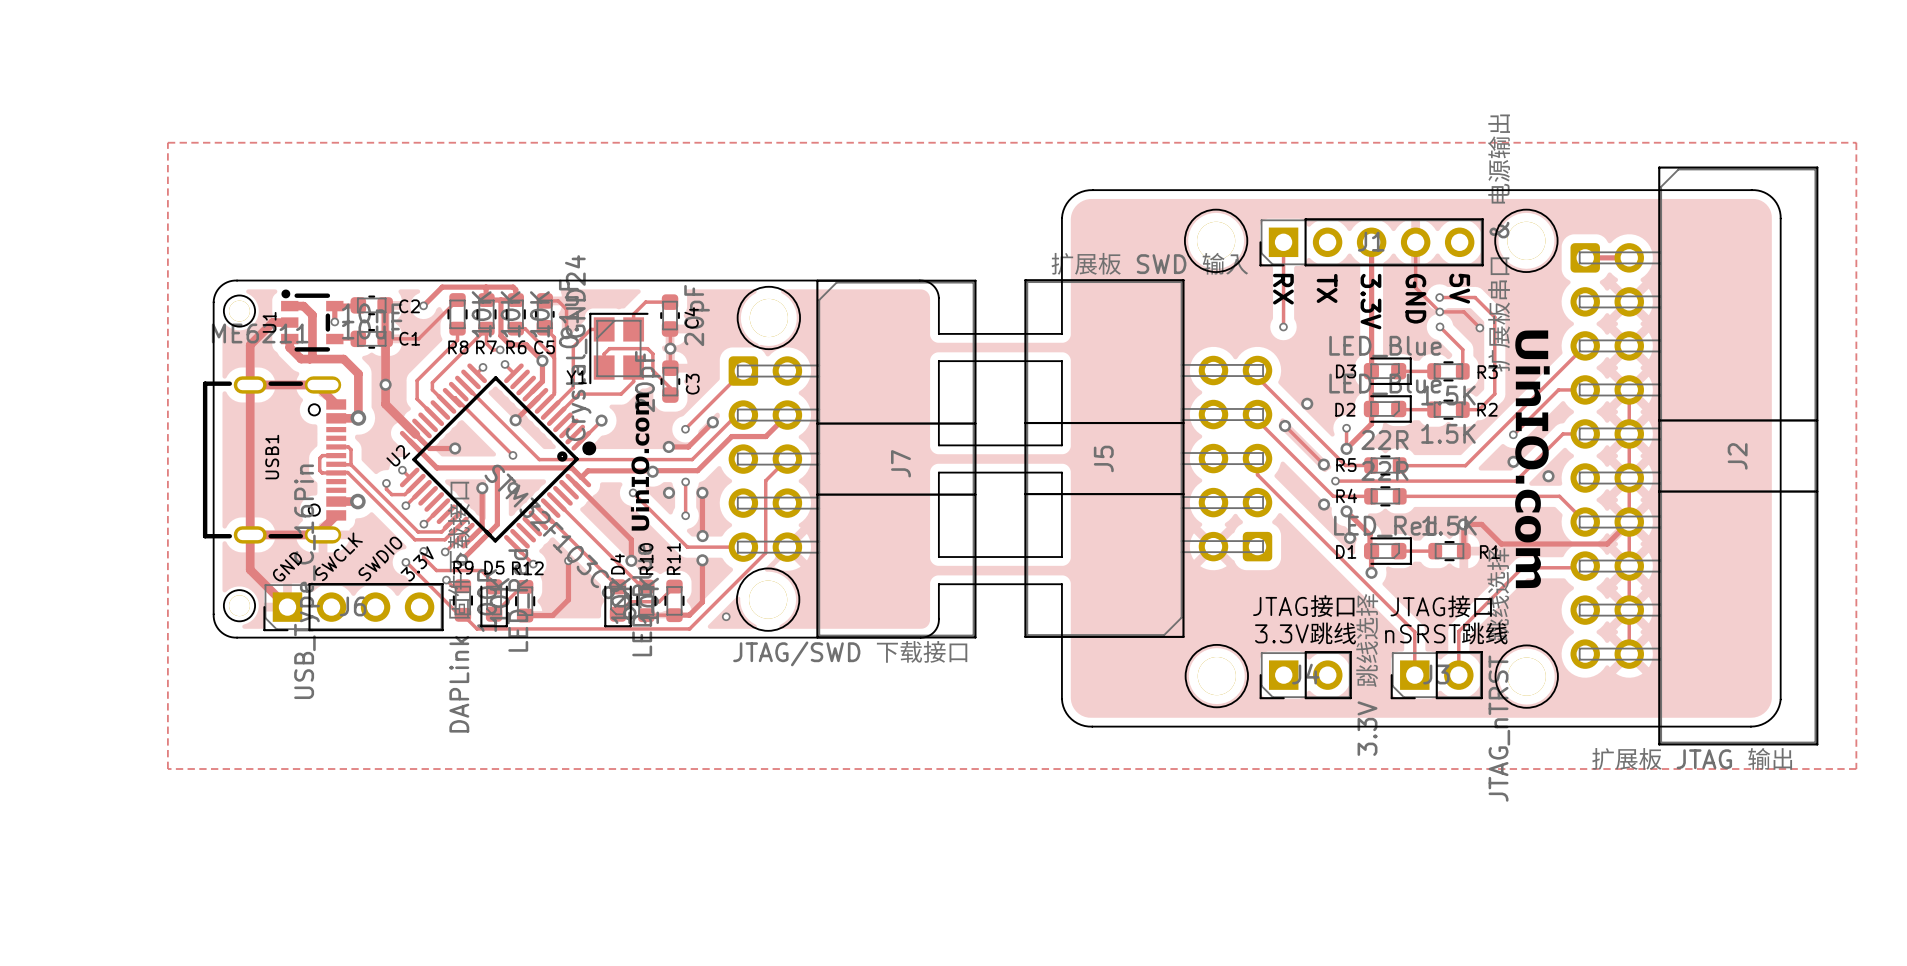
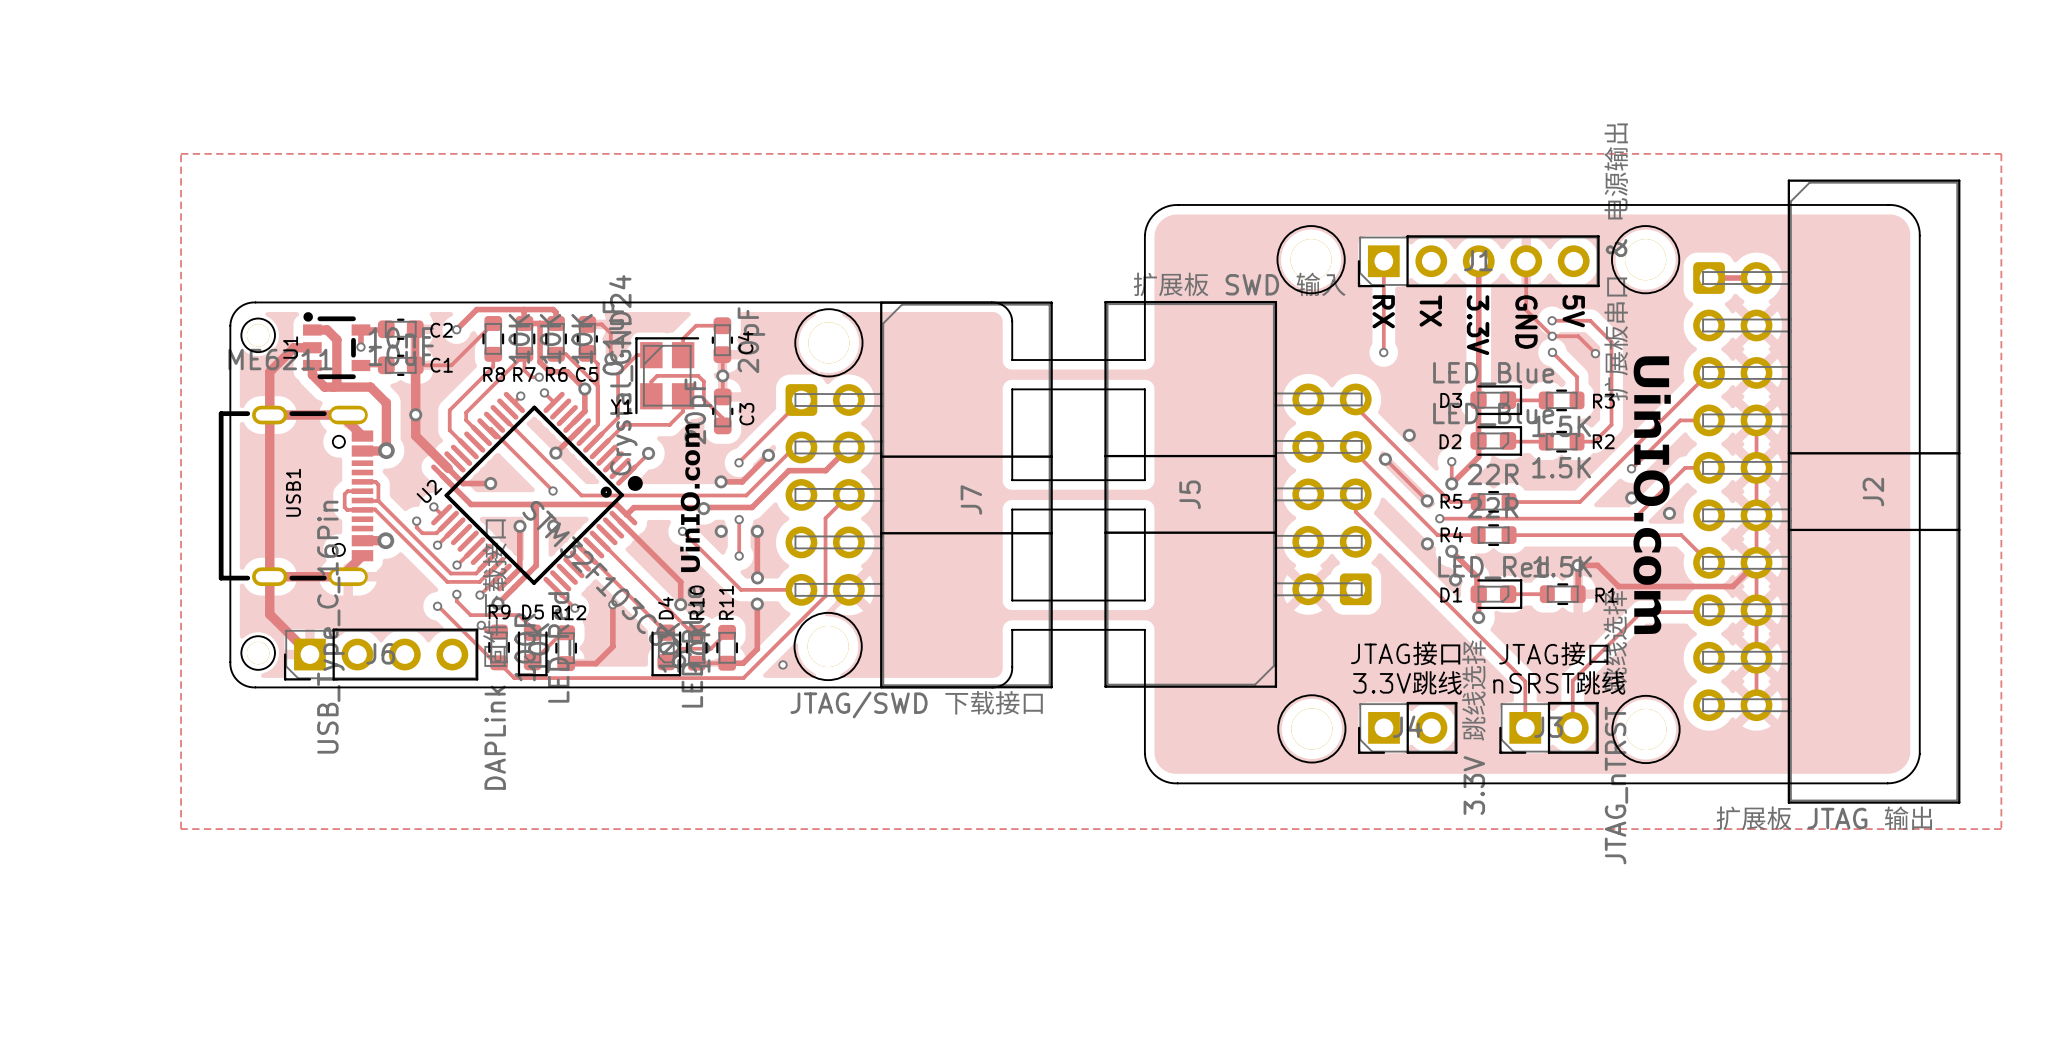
text: SWCLK (338, 556) -> none
text: SWDIO (380, 559) -> none
text: 3.3V (417, 563) -> none
text: GND (287, 566) -> none

